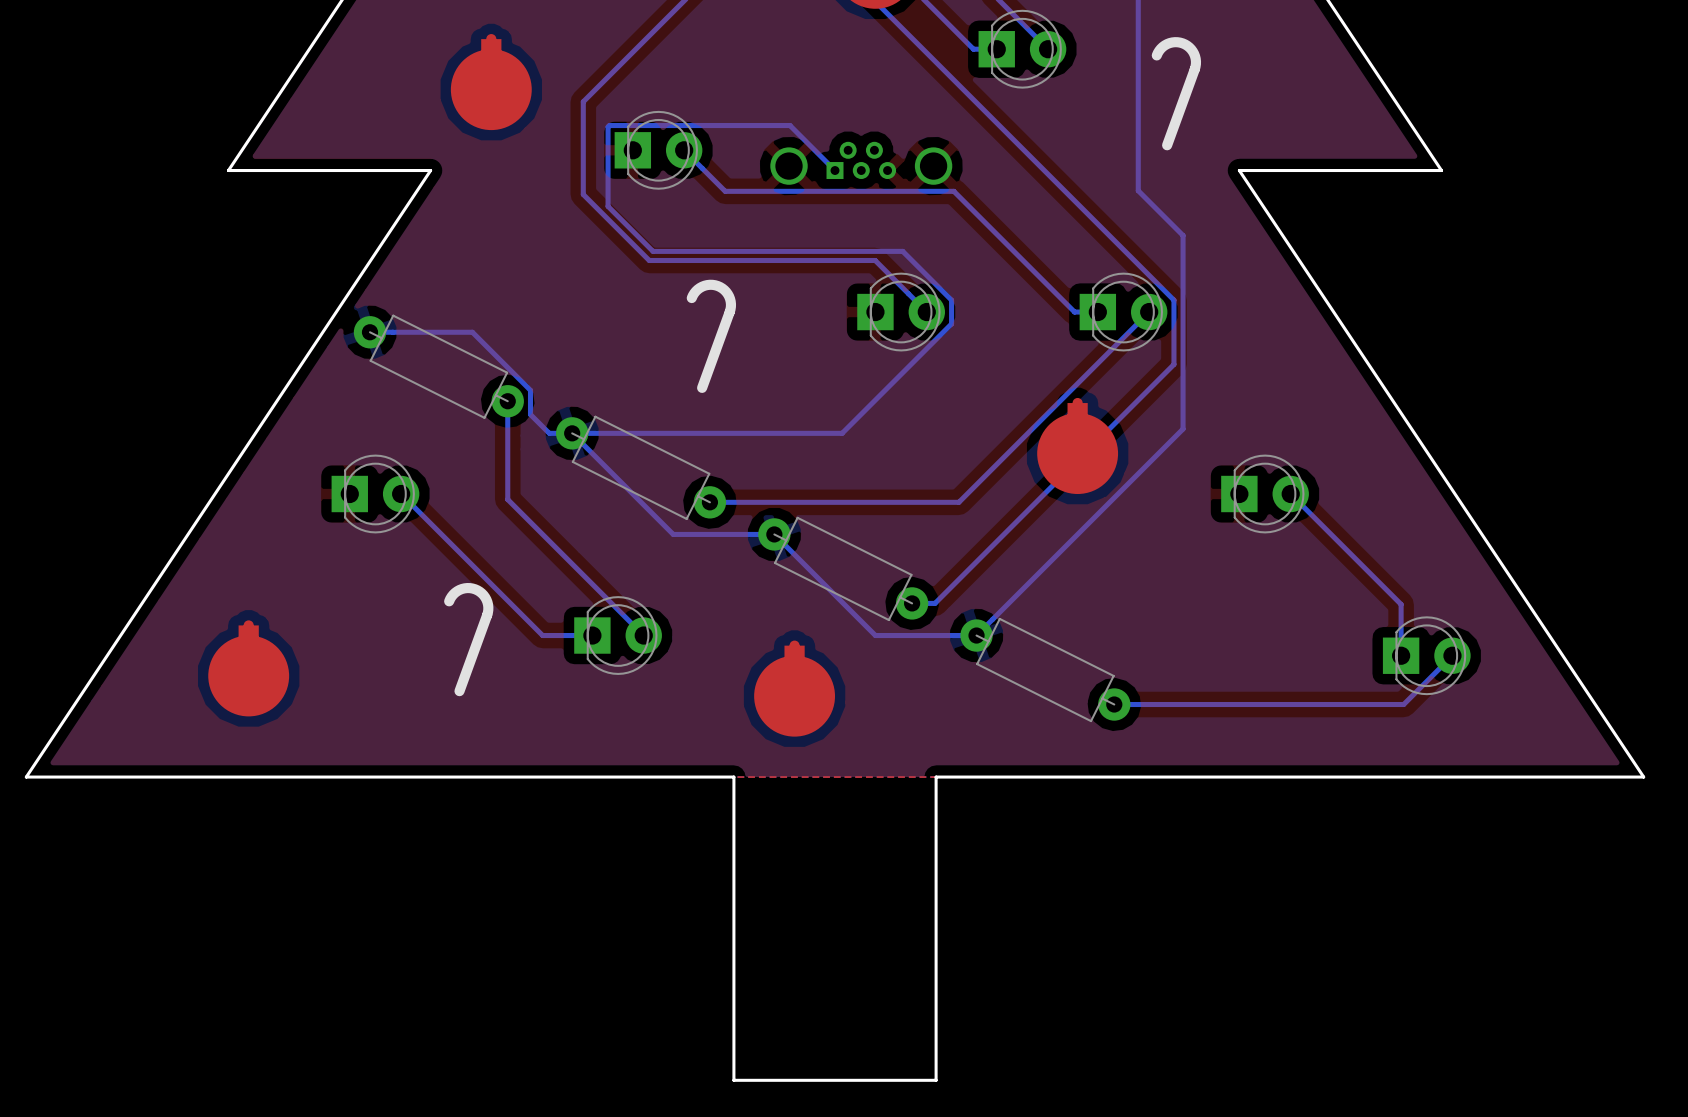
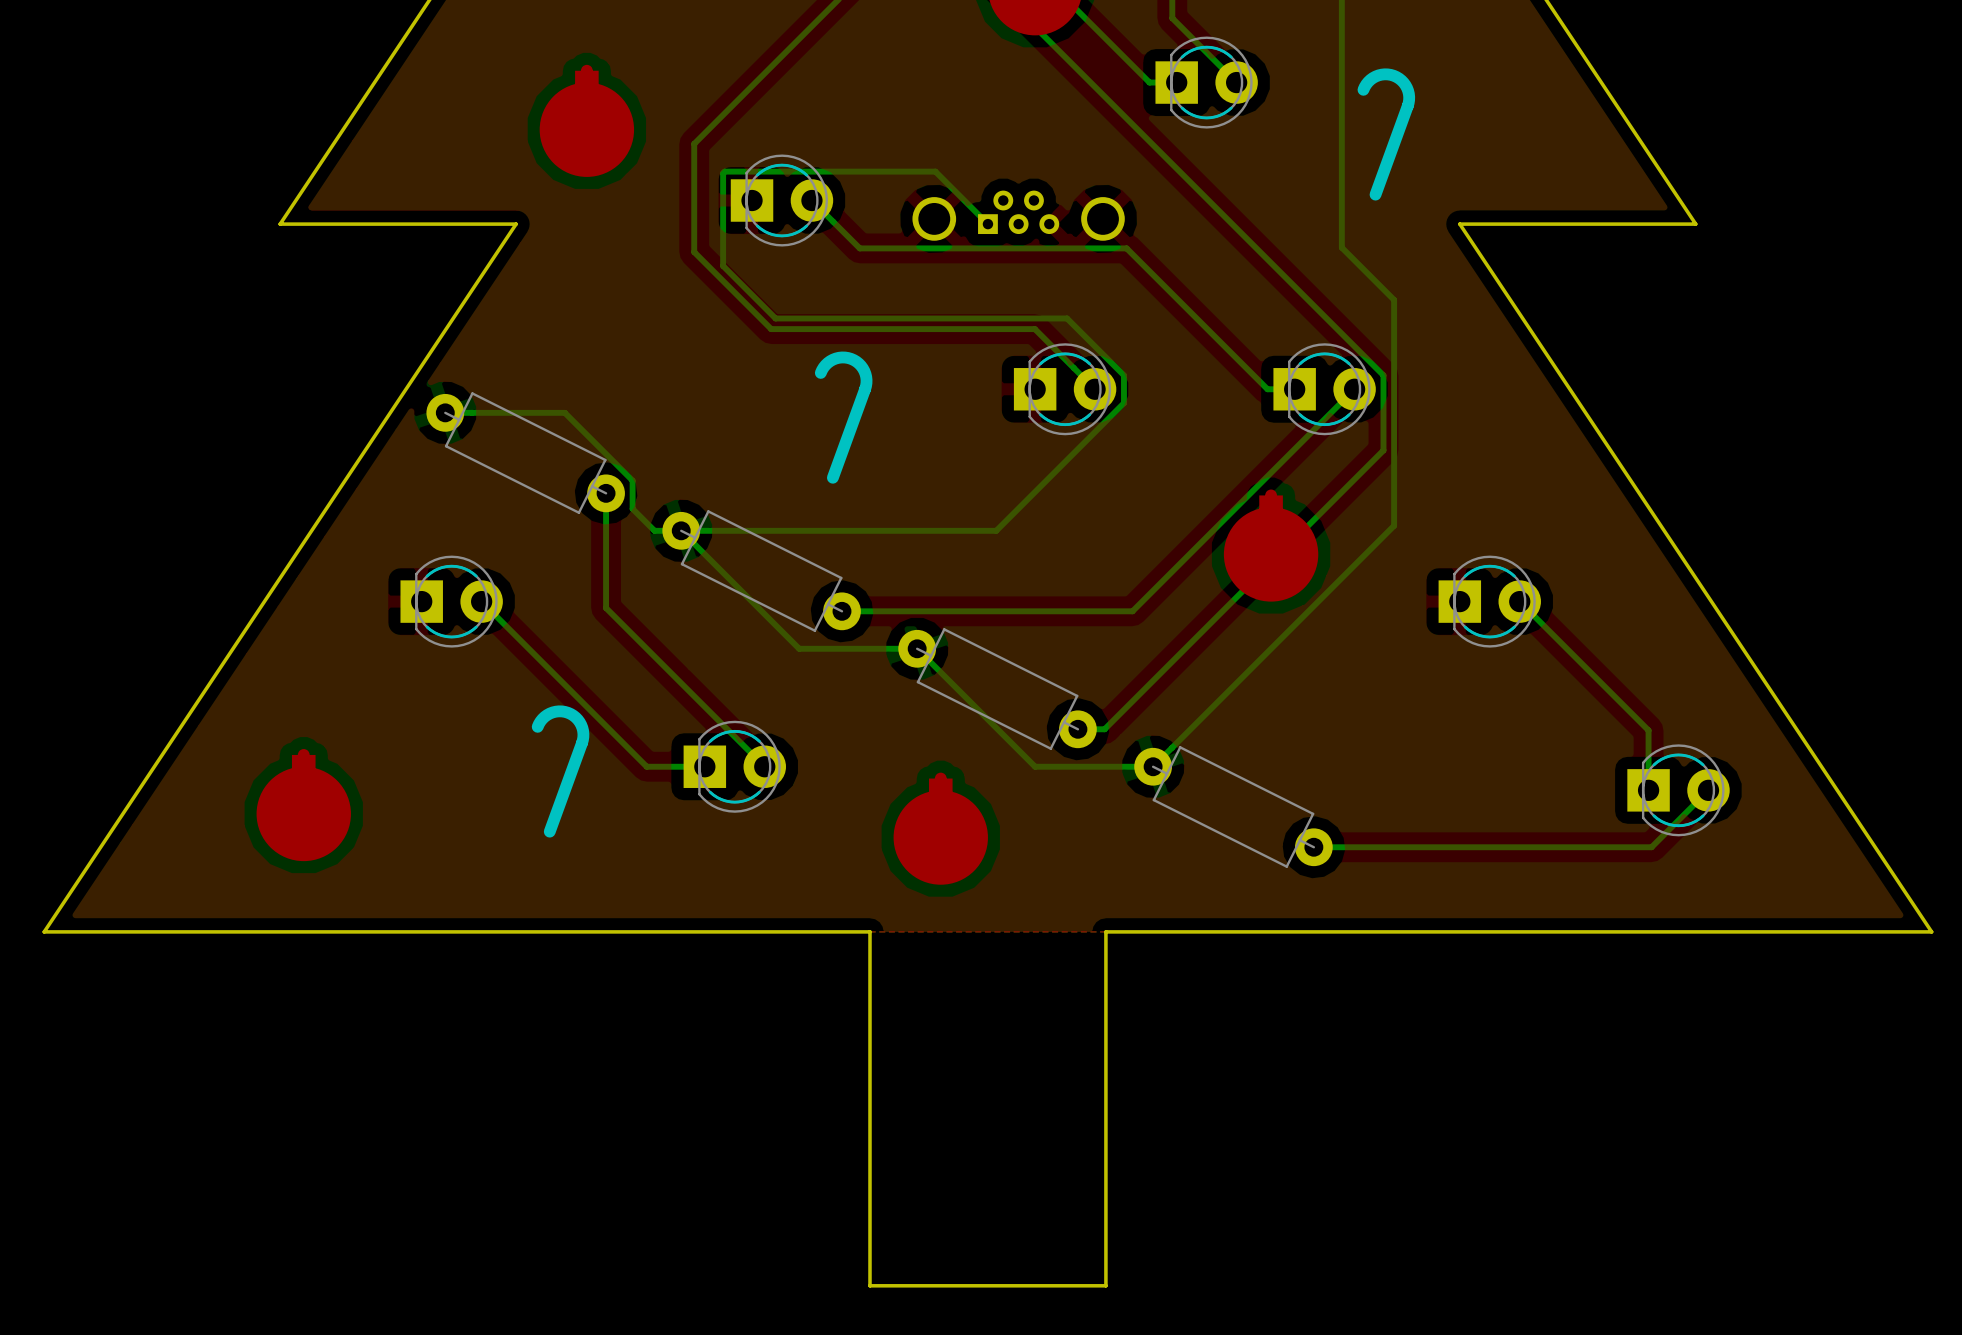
part footprint: [978, 9, 1067, 89] -> [1155, 36, 1258, 129]
part footprint: [614, 110, 703, 190] -> [730, 154, 834, 247]
part footprint: [857, 272, 945, 352] -> [1013, 343, 1117, 436]
part footprint: [1079, 272, 1168, 352] -> [1273, 343, 1376, 436]
part footprint: [331, 454, 420, 534] -> [400, 555, 503, 648]
part footprint: [1221, 454, 1309, 534] -> [1438, 555, 1541, 648]
part footprint: [574, 596, 662, 675] -> [683, 720, 787, 813]
part footprint: [1382, 616, 1471, 696] -> [1627, 744, 1730, 837]

